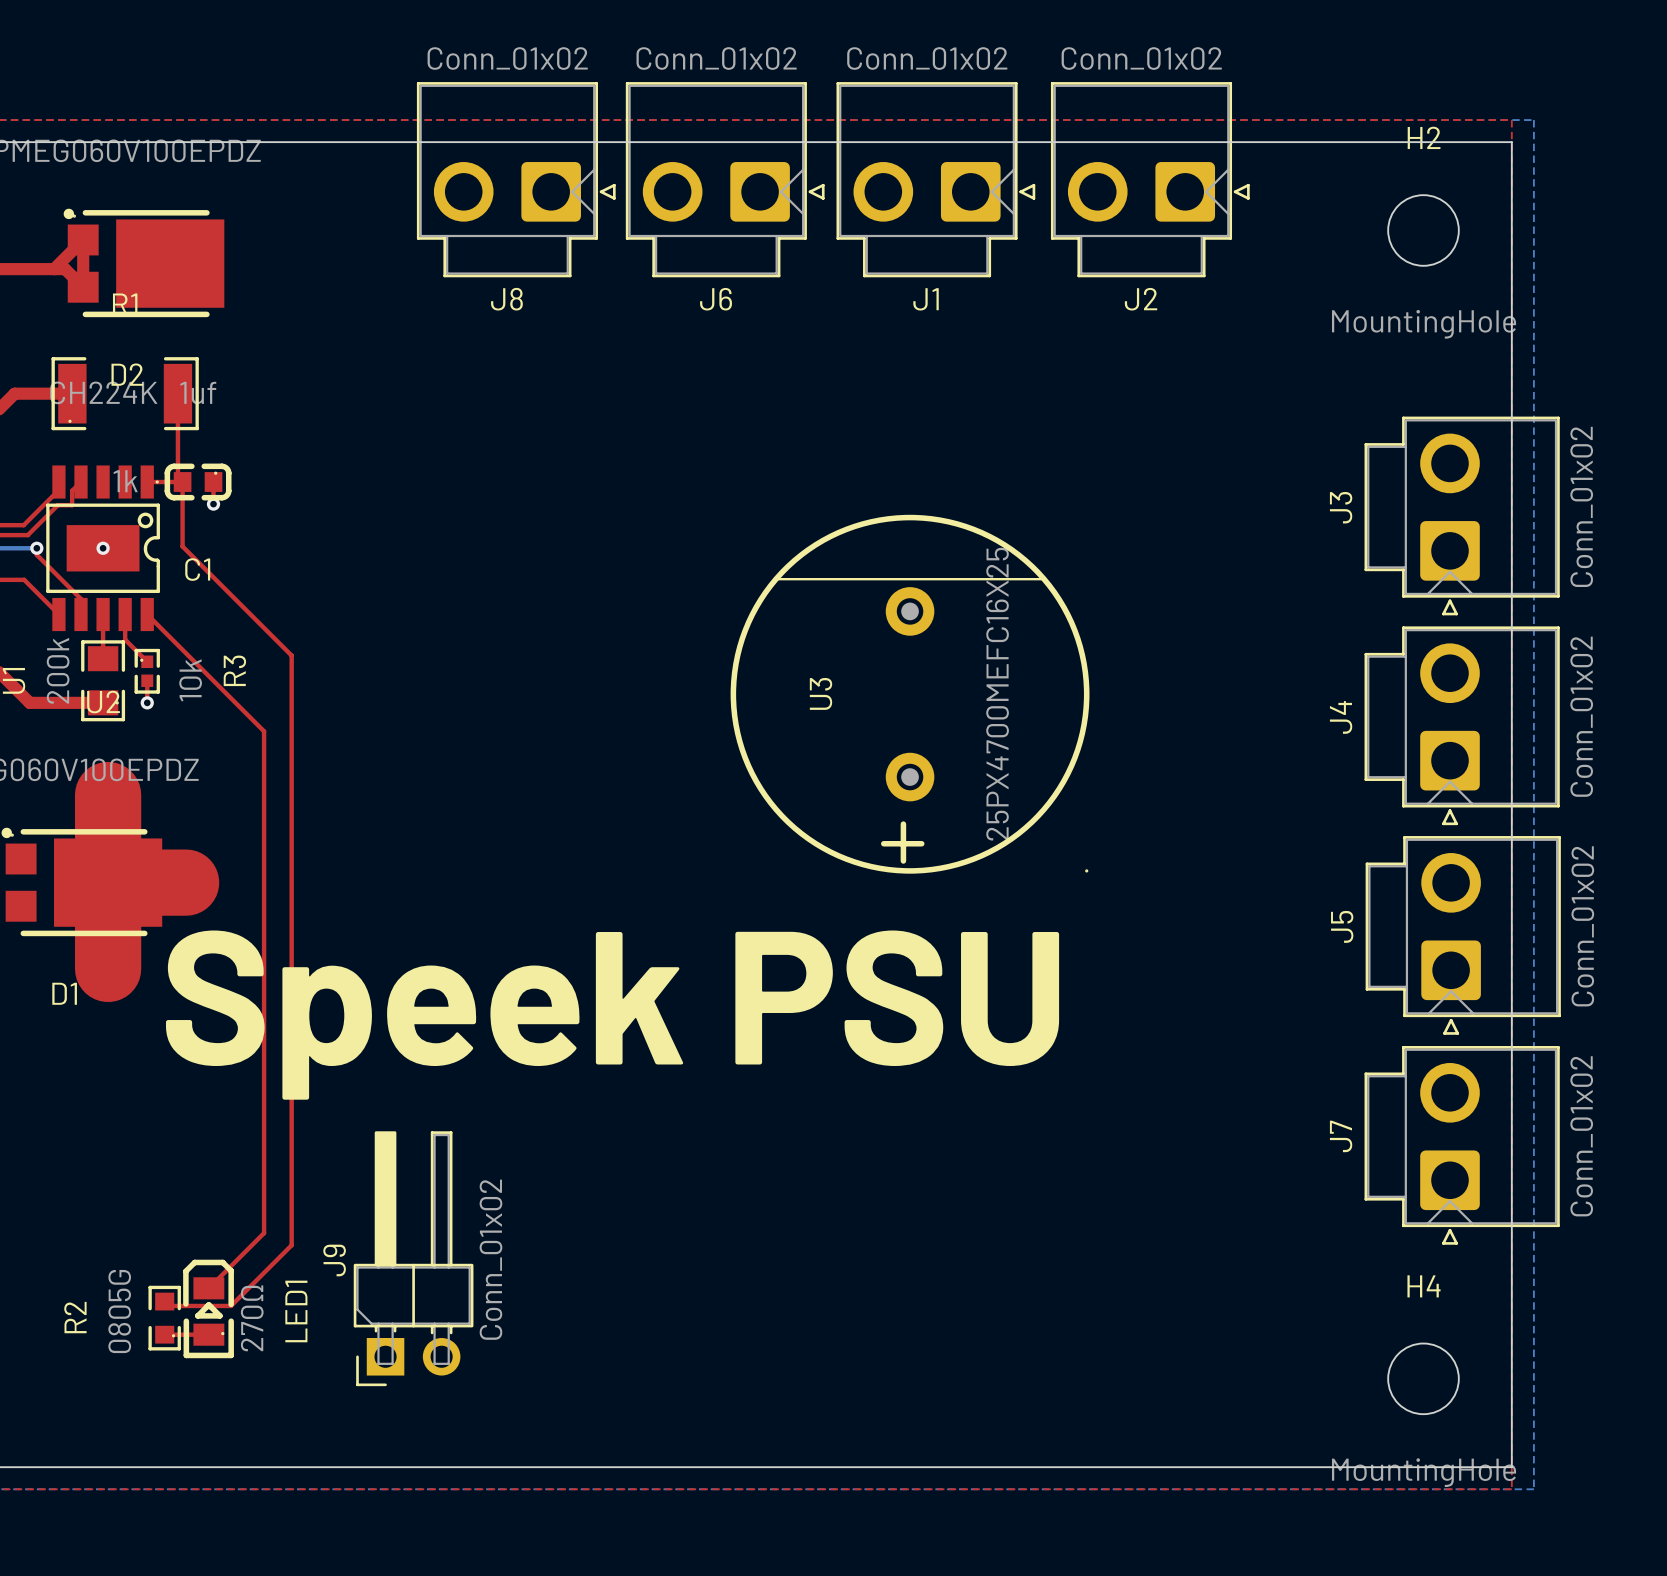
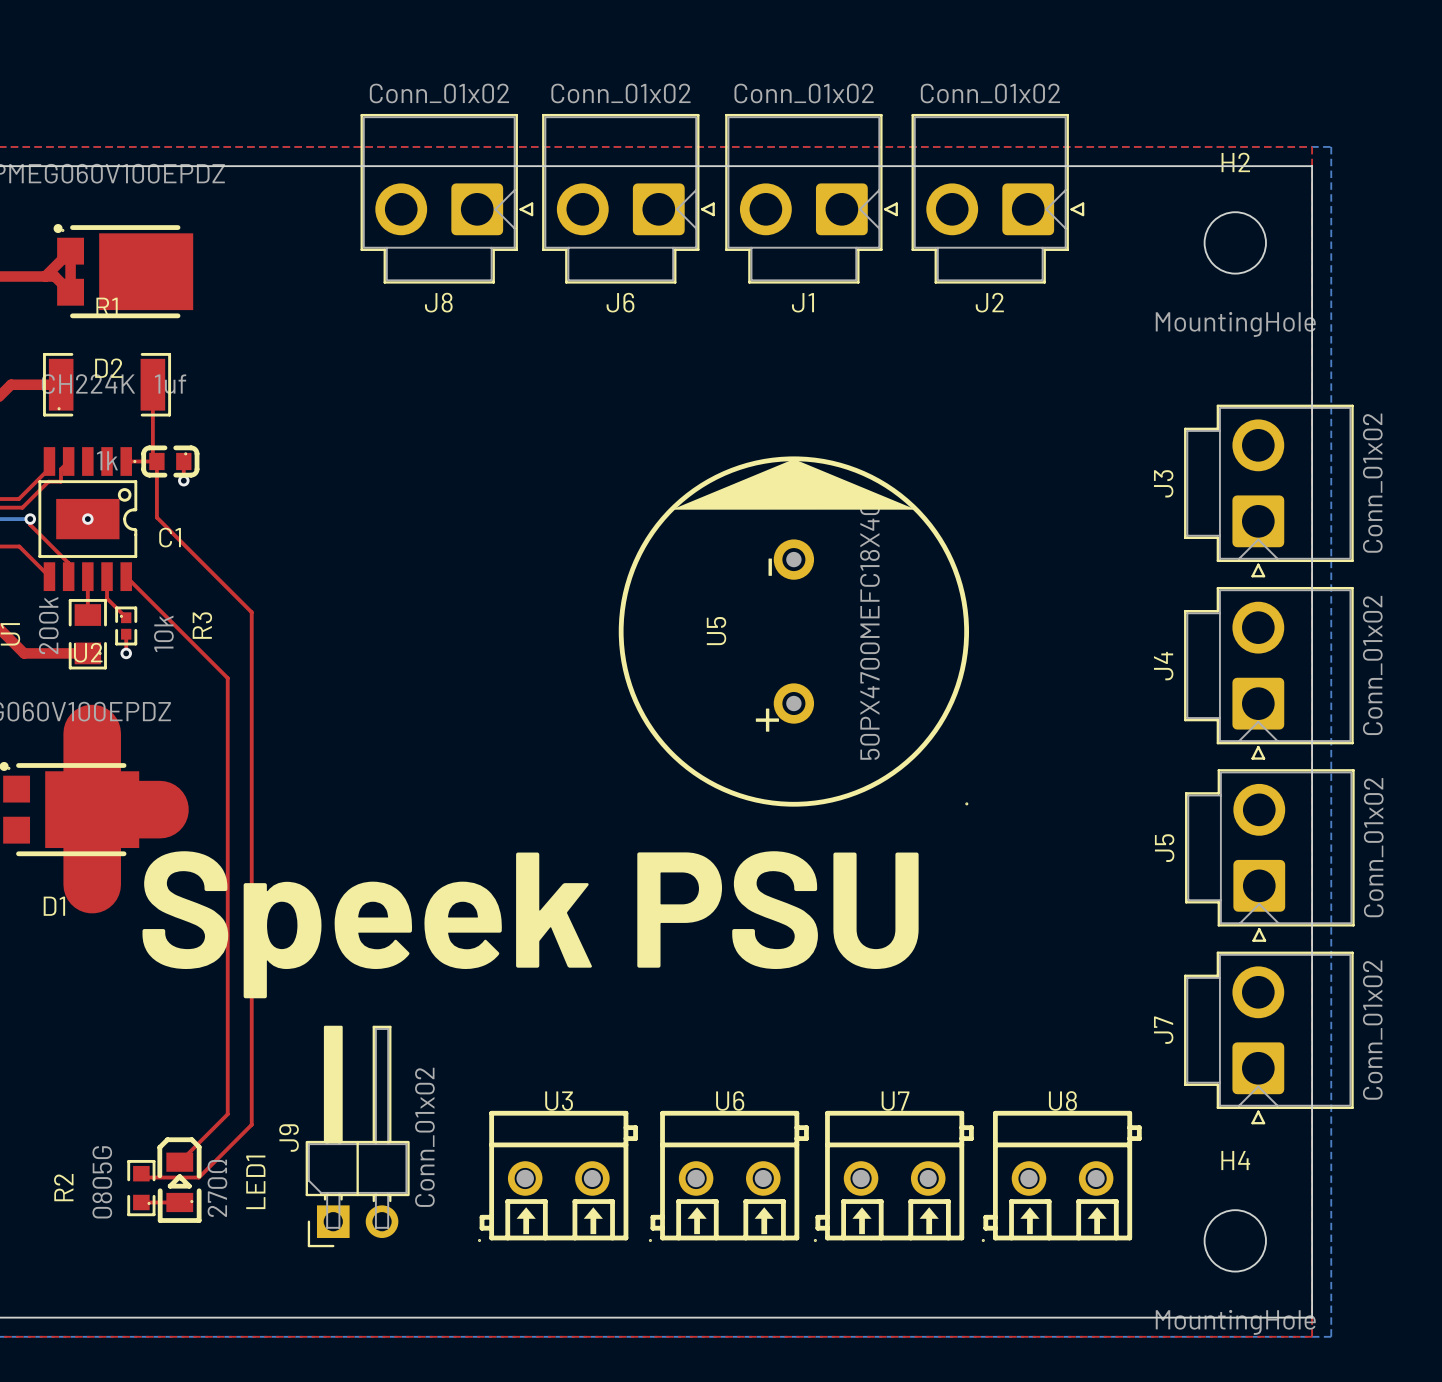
U3 footprint: [730, 514, 1090, 874] -> [478, 1110, 638, 1242]
U5: none -> 50PX4700MEFC18X40 (793, 631)
U3 name position: U3 (821, 693) -> U3 (559, 1101)
U3 value: 25PX4700MEFC16X25 (997, 694) -> none
U6: none -> (729, 1176)
U7: none -> (894, 1176)
U8: none -> (1061, 1176)

